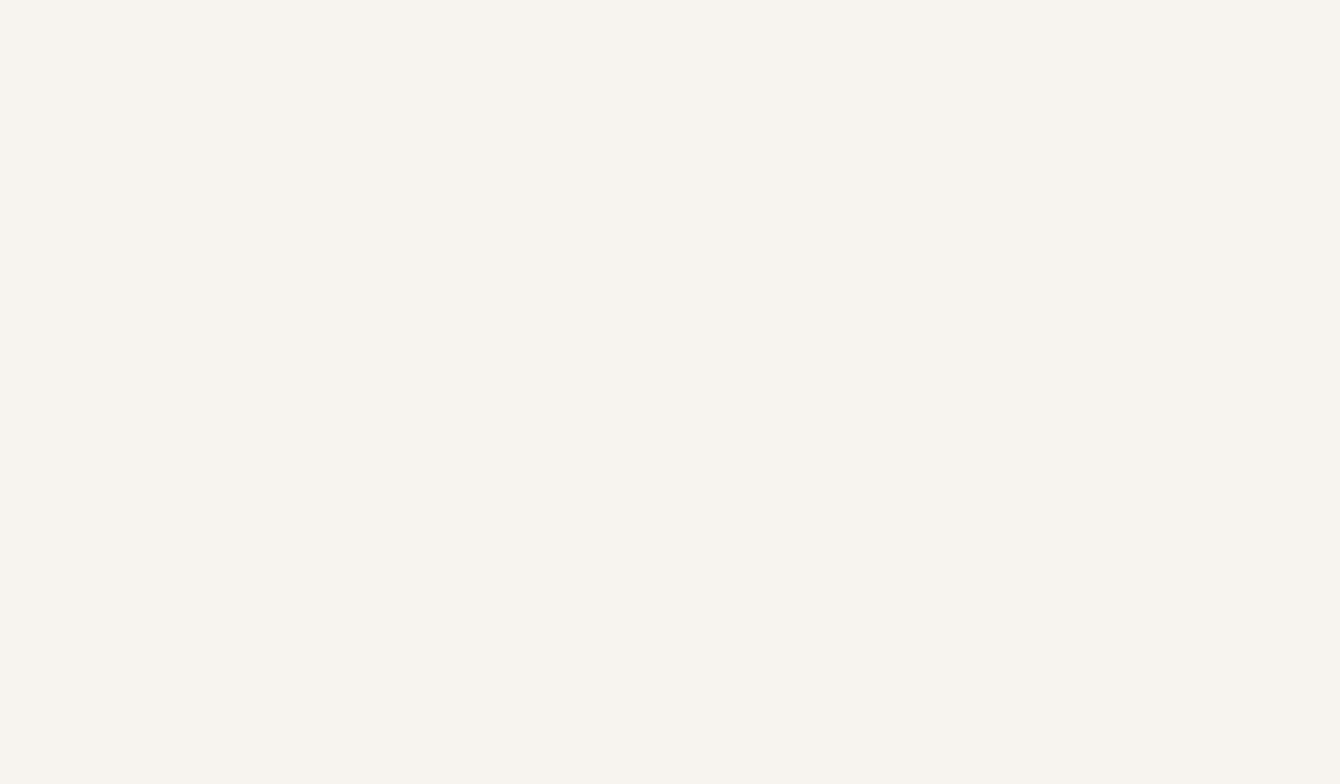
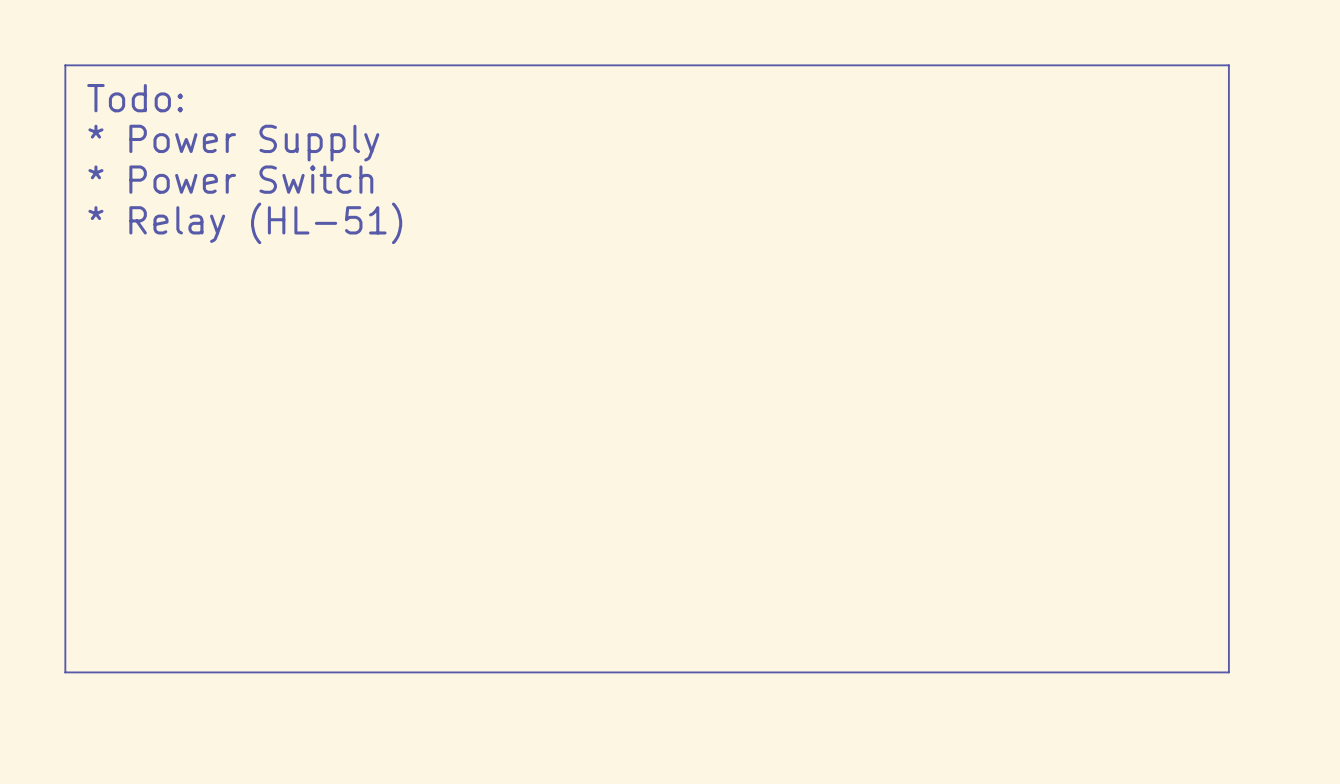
line: none -> (65, 65) (1228, 65) (1228, 672) (65, 672) (65, 65)
text: none -> Todo: (135, 98)
text: none -> * Power Supply (233, 143)
text: none -> * Power Switch (230, 179)
text: none -> * Relay (HL-51) (245, 223)

